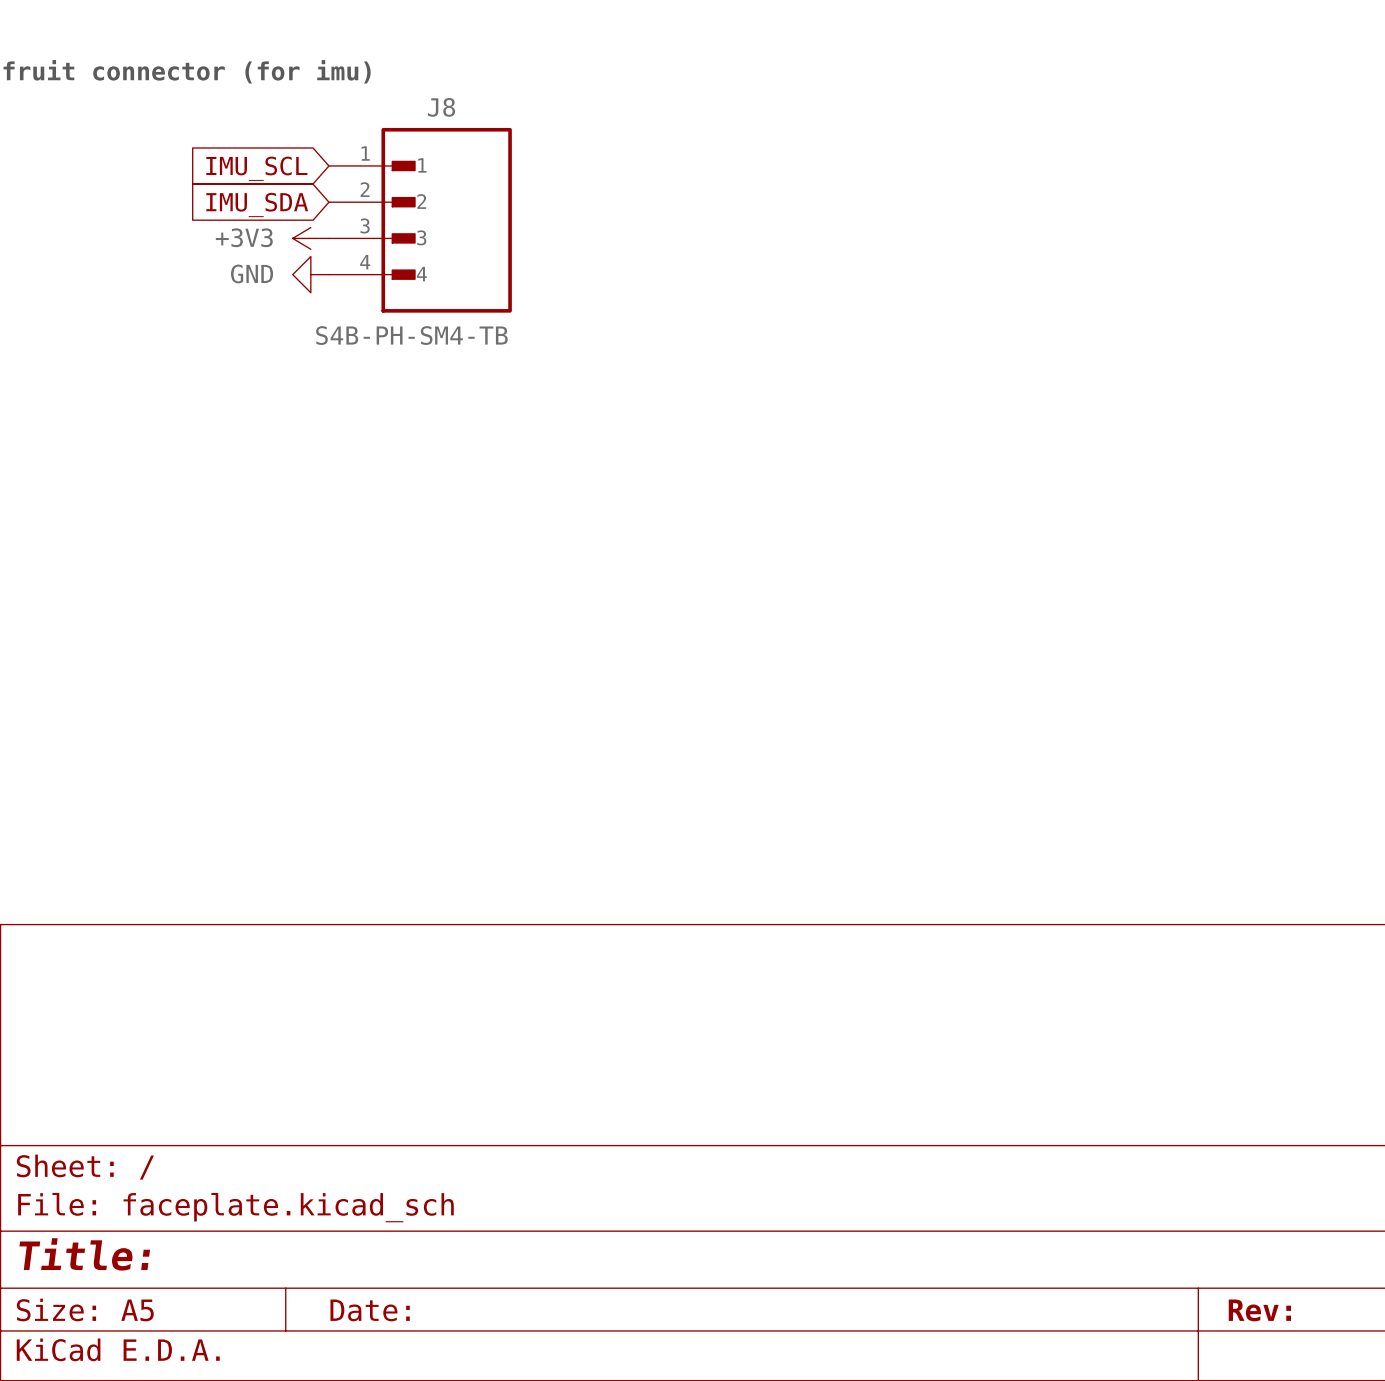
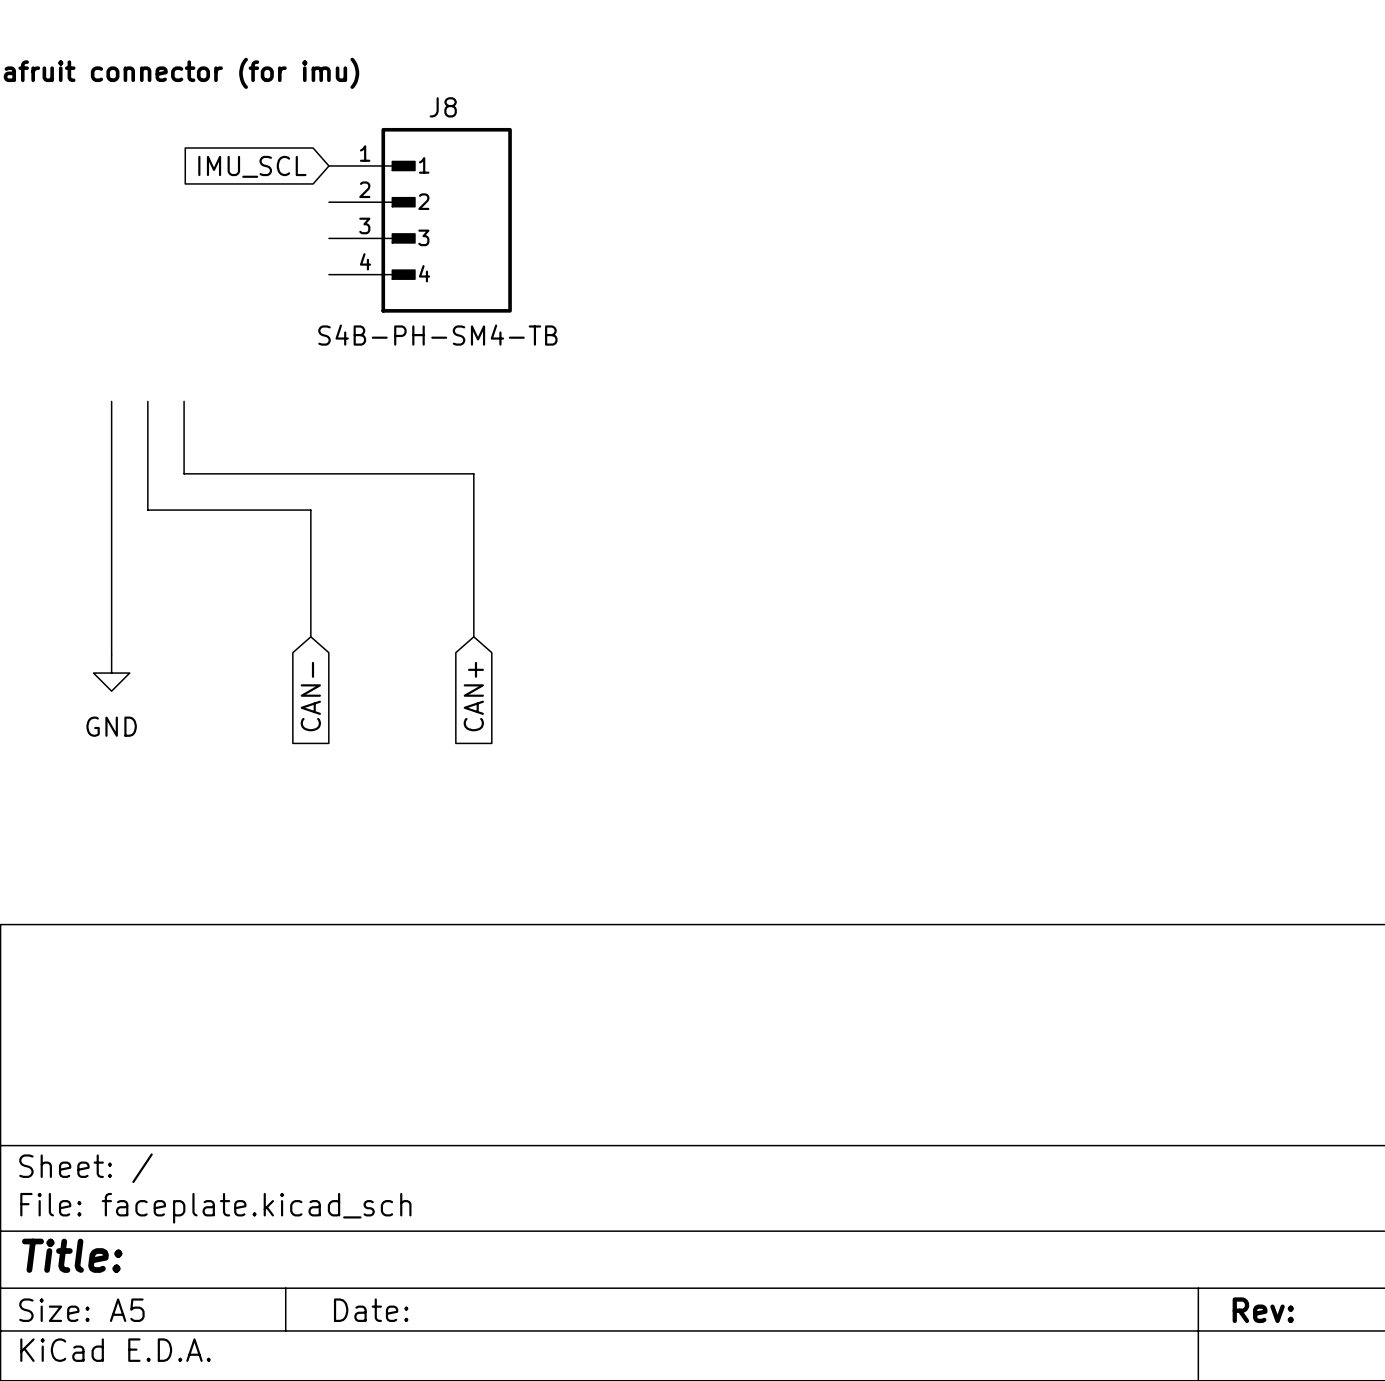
global label: IMU_SDA (257, 204) -> none
power symbol: +3V3 (310, 238) -> none
power symbol: GND (310, 274) -> none
wire: none -> (111, 401) (111, 654)
wire: none -> (147, 401) (147, 510) (310, 510) (310, 636)
wire: none -> (184, 401) (184, 473) (473, 473) (473, 636)
power symbol: none -> GND (111, 673)
global label: none -> CAN+ (473, 696)
global label: none -> CAN- (310, 696)

